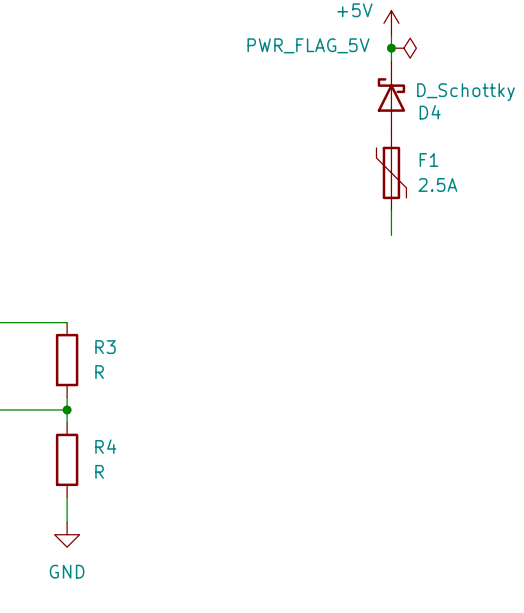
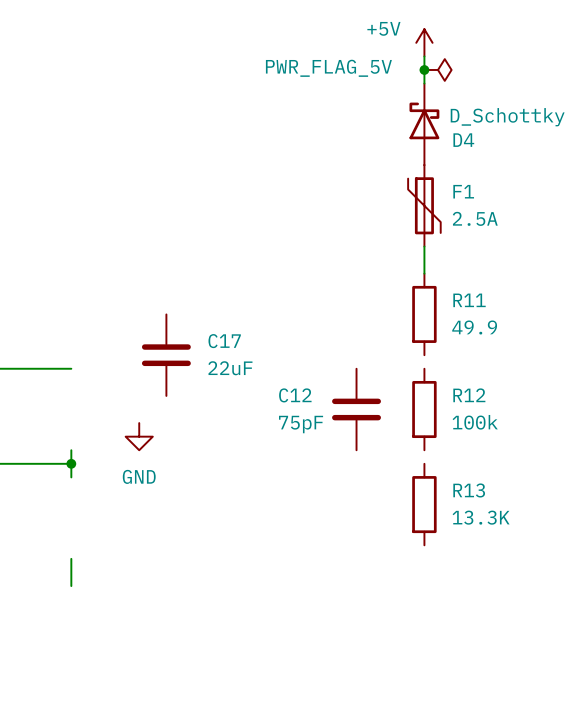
R11: none -> 49.9 (424, 314)
C17: none -> 22uF (166, 355)
R3: R (67, 360) -> none
C12: none -> 75pF (356, 409)
R12: none -> 100k (424, 409)
power symbol: none -> GND (139, 436)
R13: none -> 13.3K (424, 504)
R4: R (67, 459) -> none
power symbol: GND (67, 534) -> none

